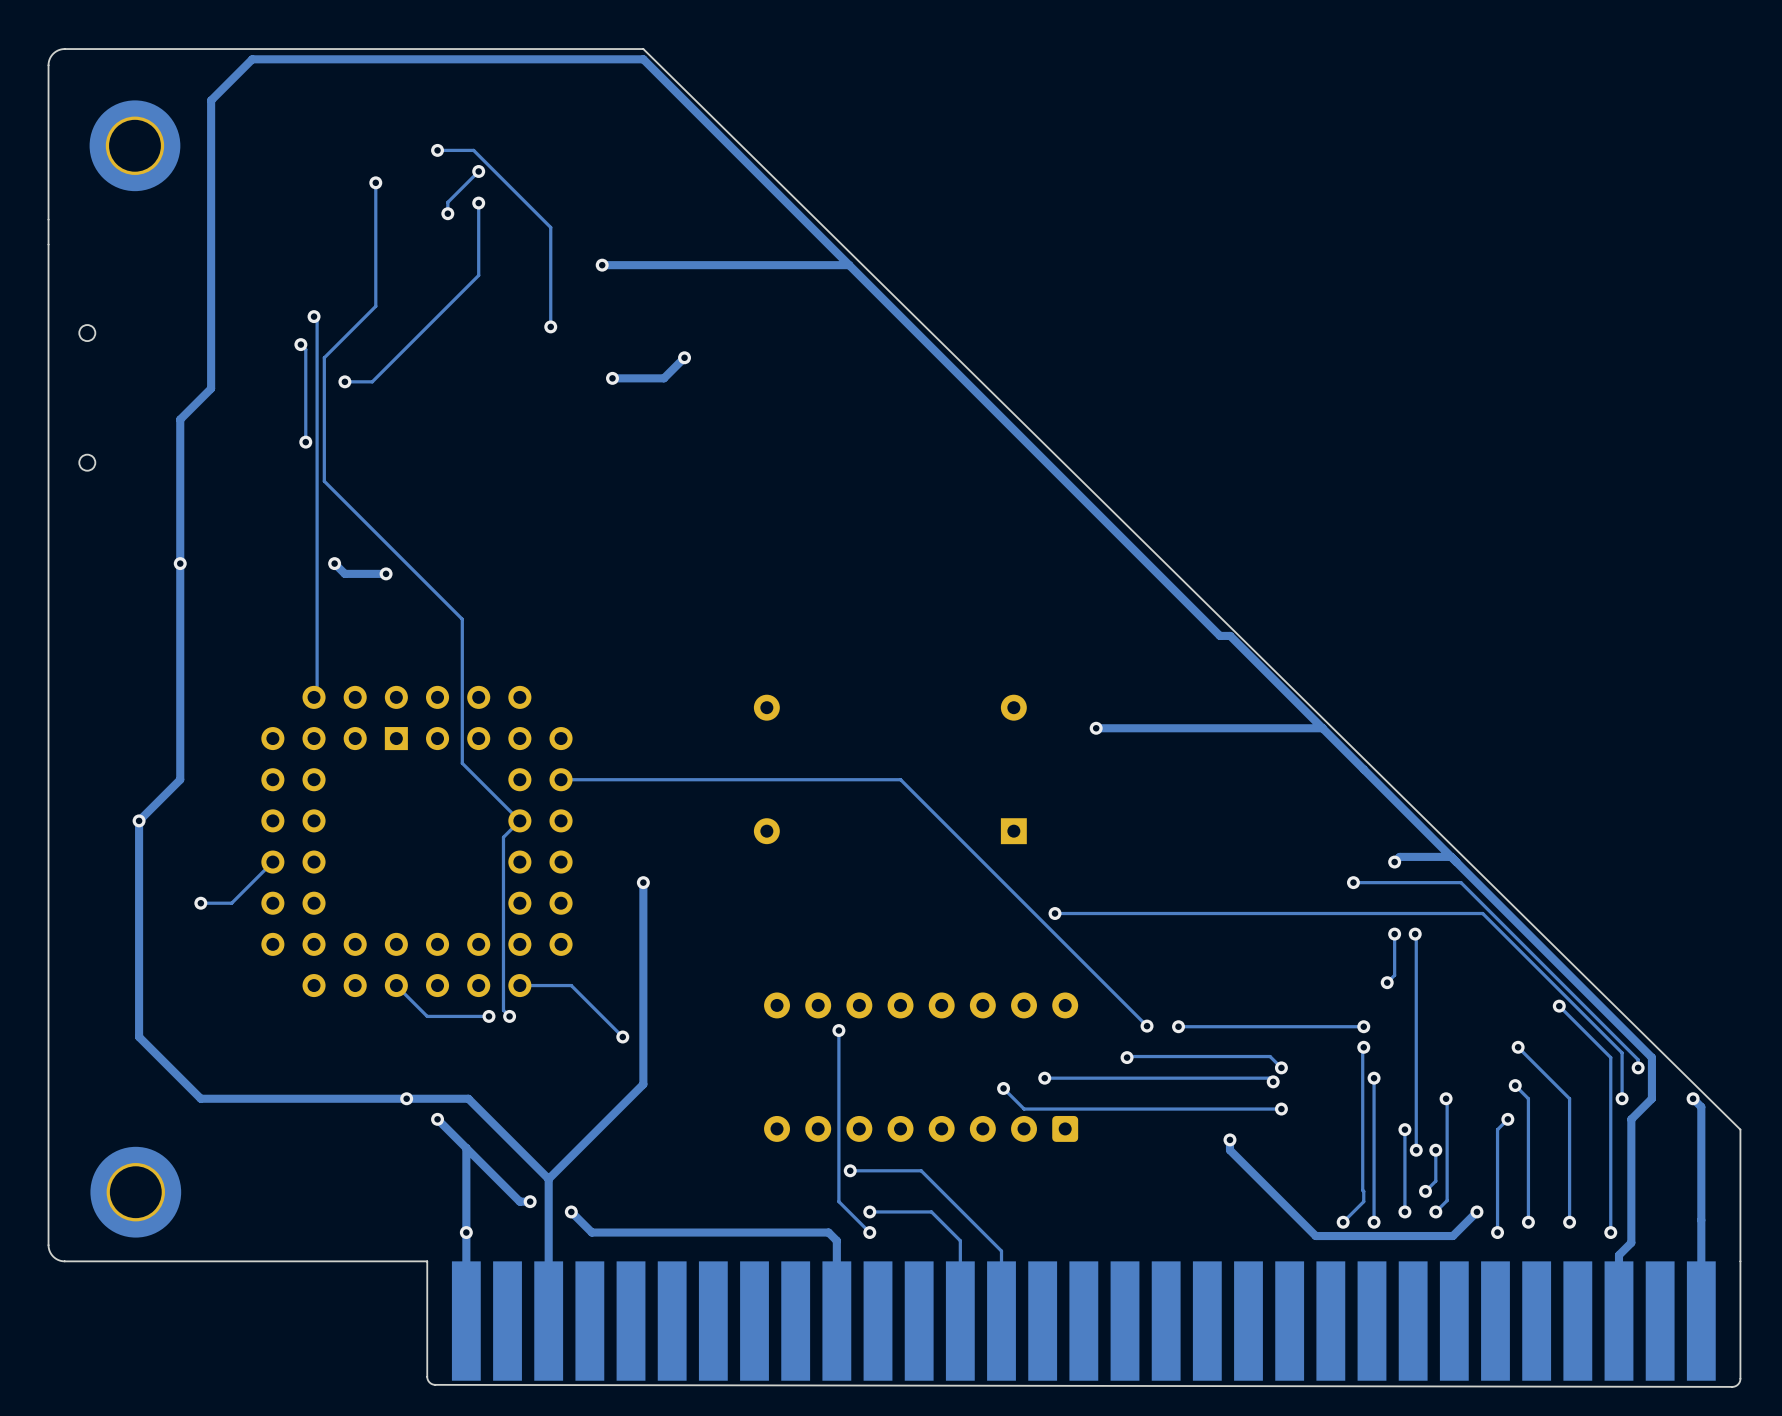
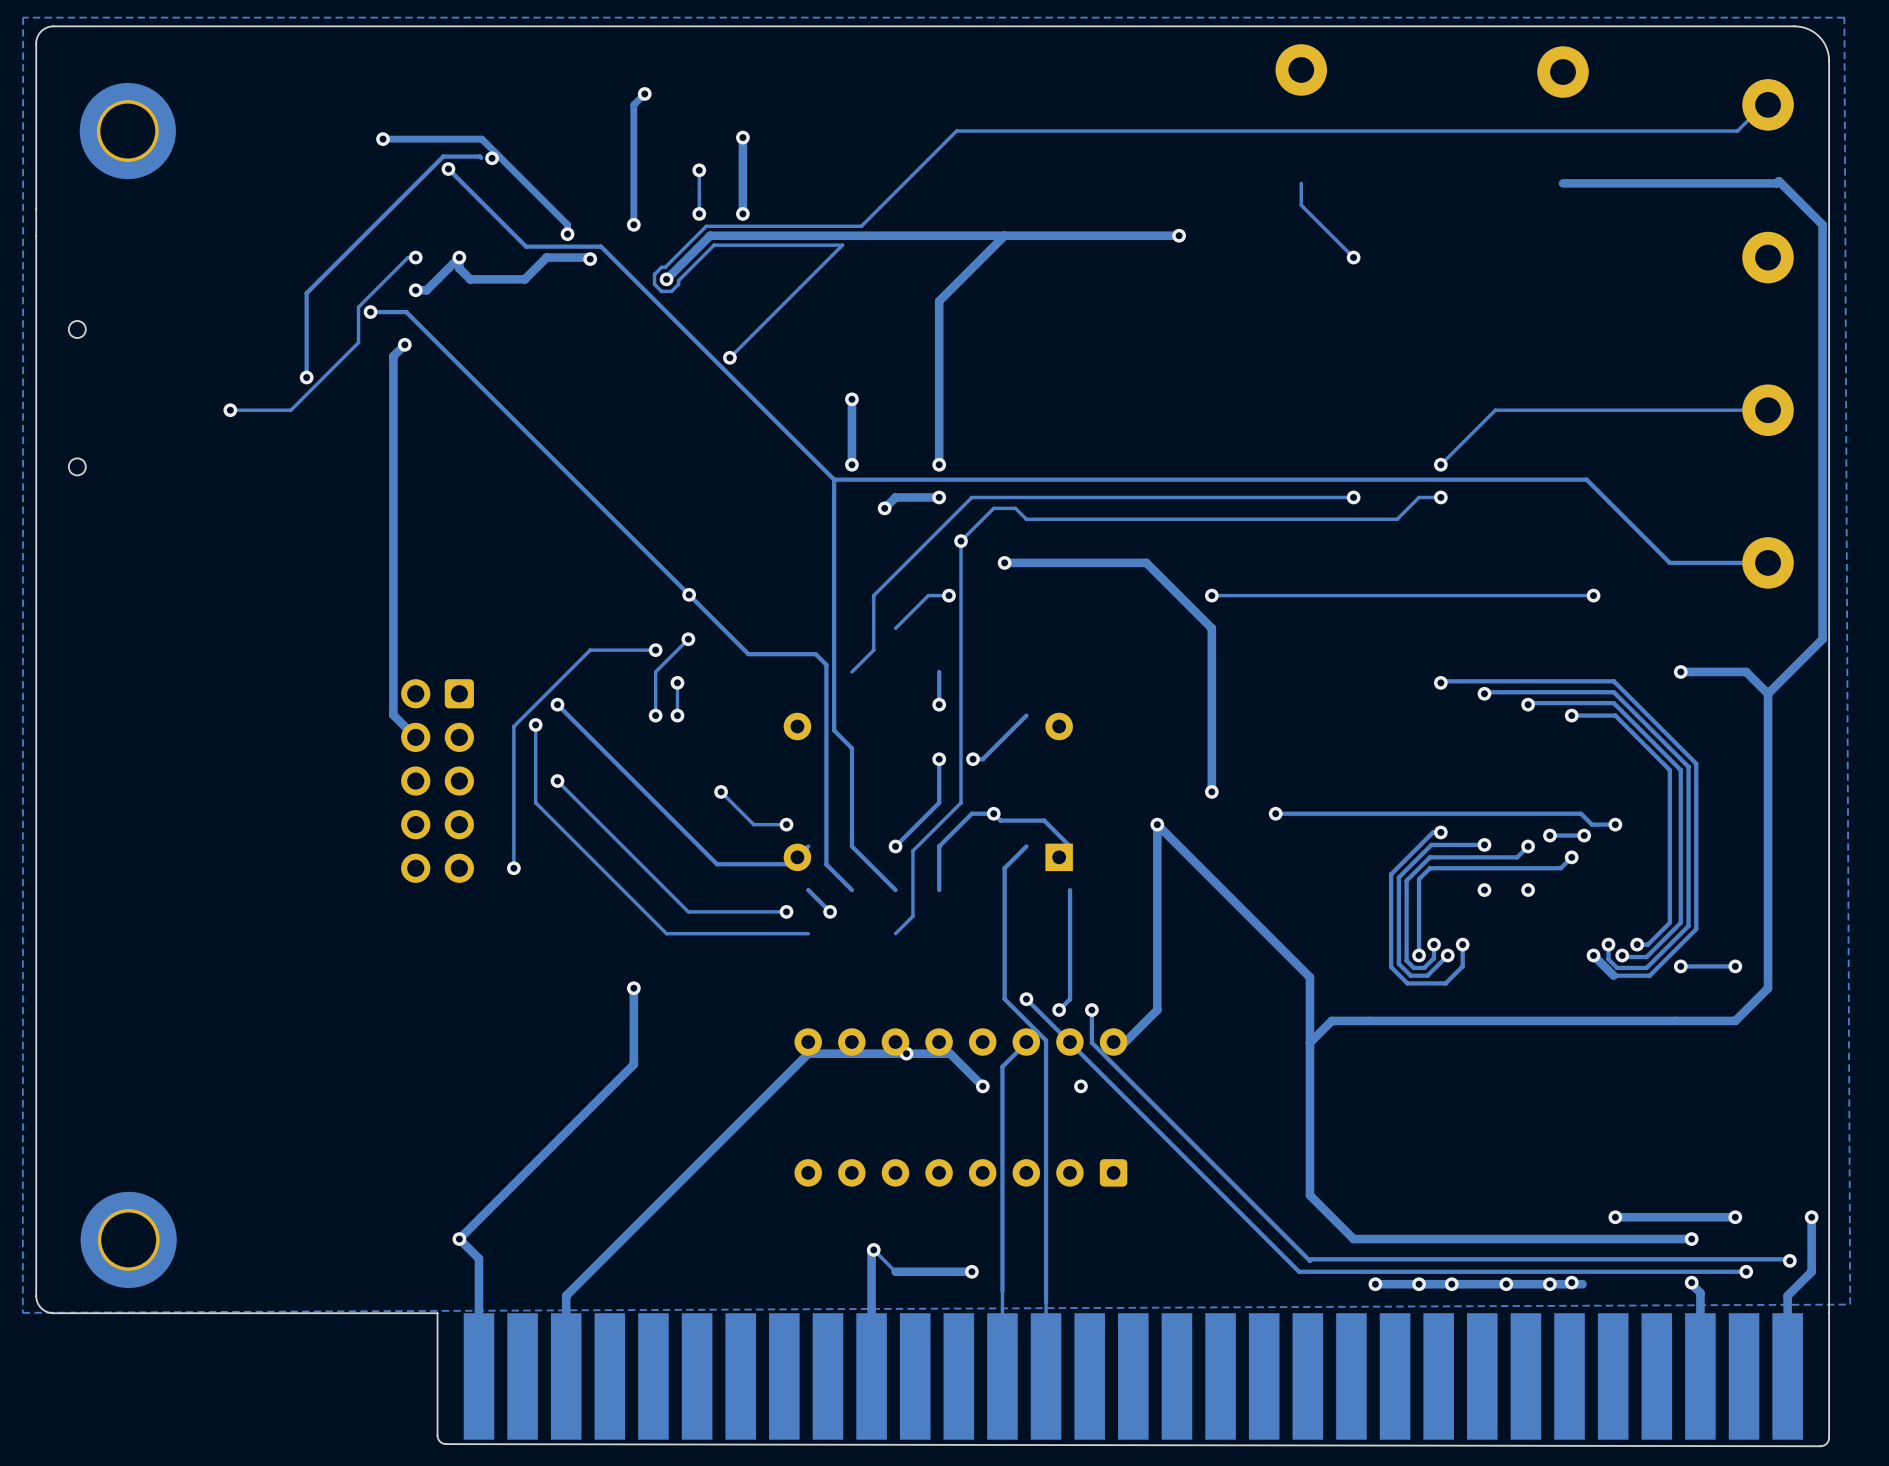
zone outline: none -> (1844, 17) (23, 17) (22, 1312) (1850, 1304) (1844, 17)
board edge: (48, 65) (53, 53) (64, 49) (643, 49) (1740, 1129) -> (36, 45) (39, 32) (45, 28) (53, 26) (1794, 26) (1813, 31) (1823, 42) (1829, 60) (1829, 1173)
part: none -> (1301, 69)
part: none -> (1563, 72)
track: none -> (644, 93) (633, 104) (633, 224)
via: none -> (644, 93)
track: none -> (1768, 104) (1763, 104) (1737, 131) (956, 131) (861, 226) (706, 226) (665, 267) (661, 267) (654, 274) (654, 284) (661, 291) (671, 291) (678, 284) (678, 280) (714, 245) (842, 245) (729, 357)
part: none -> (1768, 104)
track: (437, 150) (473, 150) (550, 227) (550, 326) -> none
via: (437, 150) -> none
track: none -> (742, 137) (742, 213)
via: none -> (742, 137)
track: none -> (383, 139) (481, 139) (567, 224) (567, 234)
track: none -> (481, 157) (443, 156) (306, 293) (306, 377)
track: (478, 171) (447, 202) (447, 213) -> none
track: none -> (448, 169) (526, 246) (601, 246) (834, 479)
via: none -> (448, 169)
track: (375, 182) (375, 306) (324, 357) (324, 481) (462, 619) (462, 763) (519, 820) (503, 837) (503, 1010) (509, 1016) -> none
via position: (375, 182) -> (383, 139)
track: none -> (699, 170) (699, 213)
via: none -> (699, 170)
track: none -> (1301, 183) (1301, 205) (1353, 257)
track: none -> (1563, 183) (1776, 183) (1778, 181) (1822, 224) (1822, 639) (1768, 693)
track: (478, 203) (478, 275) (372, 381) (344, 381) -> none
via: (478, 203) -> none
via: (447, 213) -> none
via: none -> (699, 213)
via: none -> (742, 213)
via: none -> (633, 224)
via: none -> (567, 234)
track: none -> (1004, 235) (939, 301) (939, 464)
track: none -> (1179, 235) (710, 235) (666, 279)
via: none -> (1179, 235)
track: none -> (415, 257) (408, 257) (358, 307) (358, 342) (290, 410) (230, 410)
via: none -> (415, 257)
via: none -> (459, 257)
via: (602, 265) -> none
track: (849, 265) (602, 265) -> none
via: none -> (1353, 257)
part: none -> (1768, 257)
track: none -> (590, 259) (546, 257) (524, 279) (470, 279) (459, 268) (459, 257) (426, 290) (415, 290)
via: none -> (590, 259)
via: none -> (666, 279)
via: none -> (415, 290)
track: (314, 316) (317, 319) (317, 694) (314, 697) -> none
via: (314, 316) -> none
track: none -> (370, 312) (406, 312) (748, 654) (815, 654) (826, 664) (826, 864) (851, 890)
via: none -> (370, 312)
via: (550, 326) -> none
track: (300, 344) (305, 349) (305, 442) -> none
via: (300, 344) -> none
track: none -> (404, 344) (393, 356) (393, 715) (415, 737)
via: none -> (404, 344)
track: (684, 357) (663, 378) (612, 378) -> none
via position: (684, 357) -> (729, 357)
via: none -> (306, 377)
via: (612, 378) -> none
via: (344, 381) -> none
track: none -> (851, 399) (851, 464)
via: none -> (851, 399)
via: none -> (230, 410)
track: none -> (1768, 410) (1495, 410) (1440, 464)
part: none -> (1768, 410)
via: (305, 442) -> none
via: none -> (851, 464)
via: none -> (939, 464)
via: none -> (1440, 464)
track: none -> (834, 479) (834, 730) (851, 748) (851, 846) (895, 890)
track: none -> (834, 479) (1586, 479) (1669, 562) (1768, 562)
track: none -> (939, 497) (895, 497) (884, 508)
via: none -> (939, 497)
track: none -> (1353, 497) (971, 497) (873, 595) (873, 650) (851, 671)
via: none -> (1353, 497)
track: none -> (1440, 497) (1419, 497) (1397, 519) (1026, 519) (1015, 508) (993, 508) (961, 541) (961, 802) (912, 850) (912, 916) (895, 933)
via: none -> (1440, 497)
via: none -> (884, 508)
via: none -> (961, 541)
track: none -> (1004, 562) (1146, 562) (1211, 628) (1211, 791)
via: none -> (1004, 562)
part: none -> (1768, 562)
via: (180, 563) -> none
track: (334, 563) (344, 573) (386, 573) -> none
via: (334, 563) -> none
via: (386, 573) -> none
via: none -> (689, 594)
track: none -> (948, 595) (928, 595) (895, 628)
via: none -> (948, 595)
via: none -> (1211, 595)
track: none -> (1593, 595) (1211, 595)
via: none -> (1593, 595)
track: none -> (688, 639) (655, 671) (655, 715)
via: none -> (688, 639)
track: none -> (655, 650) (590, 650) (513, 726) (513, 868)
via: none -> (655, 650)
track: none -> (939, 671) (939, 704)
track: none -> (1680, 671) (1746, 671) (1768, 693)
via: none -> (1680, 671)
track: none -> (677, 682) (677, 715)
via: none -> (677, 682)
track: none -> (1440, 682) (1442, 681) (1613, 681) (1696, 763) (1696, 929) (1649, 975) (1613, 975)
via: none -> (1440, 682)
track: none -> (1484, 693) (1486, 692) (1613, 692) (1688, 766) (1688, 926) (1646, 967) (1617, 967) (1608, 959) (1608, 944)
via: none -> (1484, 693)
track: none -> (1768, 693) (1768, 988) (1735, 1020) (1331, 1020) (1309, 1042)
track: none -> (557, 704) (717, 864) (790, 864) (808, 846)
via: none -> (557, 704)
via: none -> (939, 704)
track: none -> (1528, 704) (1529, 703) (1613, 703) (1680, 770) (1680, 922) (1646, 957) (1622, 955)
via: none -> (1528, 704)
via: none -> (655, 715)
via: none -> (677, 715)
track: none -> (1026, 715) (982, 759) (973, 759)
track: none -> (1571, 715) (1615, 715) (1669, 770) (1669, 922) (1648, 944) (1637, 944)
via: none -> (1571, 715)
track: none -> (535, 724) (535, 802) (666, 933) (808, 933)
via: none -> (535, 724)
via: (1096, 728) -> none
track: (1322, 728) (1096, 728) -> none
track: none -> (939, 759) (939, 802) (895, 846)
via: none -> (939, 759)
via: none -> (973, 759)
part: none -> (437, 781)
track: none -> (557, 781) (688, 911) (786, 911)
via: none -> (557, 781)
track: none -> (721, 791) (753, 824) (786, 824)
via: none -> (721, 791)
via: none -> (1211, 791)
track: (561, 779) (900, 779) (1147, 1026) -> none
via: none -> (993, 813)
track: none -> (1275, 813) (1581, 813) (1591, 824) (1615, 824)
via: none -> (1275, 813)
via: none -> (786, 824)
via: none -> (1157, 824)
via: none -> (1615, 824)
track: none -> (1440, 832) (1432, 832) (1391, 874) (1391, 967) (1407, 983) (1445, 983) (1462, 966) (1462, 944)
via: none -> (1440, 832)
via: none -> (1549, 835)
track: none -> (1584, 835) (1549, 835)
via: none -> (1584, 835)
track: none -> (1484, 844) (1431, 844) (1398, 877) (1398, 963) (1410, 975) (1427, 975) (1447, 955)
via: none -> (1484, 844)
via: (139, 820) -> none
via: none -> (895, 846)
track: none -> (1070, 846) (1044, 820) (1000, 820) (993, 813) (971, 813) (939, 846) (939, 890)
track: none -> (1528, 846) (1517, 857) (1429, 857) (1406, 880) (1406, 960) (1413, 967) (1424, 967) (1433, 958) (1433, 944)
via: none -> (1528, 846)
track: none -> (1571, 857) (1560, 868) (1429, 868) (1419, 879) (1419, 955)
via: none -> (1571, 857)
part: (416, 841) -> none
via: none -> (513, 868)
track: (1451, 856) (1399, 856) (1394, 862) -> none
track: (272, 862) (231, 903) (200, 903) -> none
track: none -> (808, 890) (830, 911)
track: none -> (1070, 890) (1070, 999) (1059, 1010)
via position: (1394, 862) -> (1484, 890)
via: none -> (1528, 890)
track: (643, 882) (643, 1084) (548, 1179) -> none
via: (643, 882) -> none
via: none -> (786, 911)
via: none -> (830, 911)
track: (1353, 882) (1461, 882) (1638, 1059) (1638, 1067) -> none
via: (1353, 882) -> none
via: (200, 903) -> none
track: (1055, 913) (1482, 913) (1622, 1052) (1622, 1098) -> none
via: (1055, 913) -> none
via: none -> (1433, 944)
via: none -> (1462, 944)
via: none -> (1608, 944)
via: none -> (1637, 944)
via: none -> (1419, 955)
via: none -> (1447, 955)
track: (1518, 923) (1230, 635) (1219, 635) (643, 59) (252, 59) (211, 100) (211, 388) (180, 419) (180, 779) (139, 820) (139, 1037) (200, 1098) (468, 1098) (548, 1179) -> none
via: none -> (1593, 955)
via: none -> (1622, 955)
track: (1394, 934) (1394, 975) (1387, 982) -> none
via: (1394, 934) -> none
track: (1415, 934) (1416, 1150) -> none
via: (1415, 934) -> none
via: none -> (1680, 966)
track: none -> (1735, 966) (1680, 966)
via: none -> (1735, 966)
track: (1537, 942) (1651, 1057) (1651, 1098) (1631, 1119) (1631, 1242) (1618, 1255) -> (1691, 1284) (1700, 1292) (1700, 1306)
via: none -> (633, 988)
track: none -> (1026, 999) (1299, 1271) (1746, 1271)
via: none -> (1026, 999)
via: none -> (1059, 1010)
track: none -> (1091, 1010) (1091, 1042) (1309, 1260) (1311, 1259) (1788, 1259) (1789, 1260)
via: none -> (1091, 1010)
via: (1387, 982) -> none
track: (396, 985) (427, 1016) (488, 1016) -> none
track: (519, 985) (571, 985) (622, 1037) -> none
track: none -> (1124, 1042) (1157, 1010) (1157, 824) (1309, 977) (1309, 1195) (1353, 1239) (1691, 1239)
track: (1559, 1006) (1610, 1057) (1610, 1232) -> none
via: (1559, 1006) -> none
via: (488, 1016) -> none
via: (509, 1016) -> none
via: (1147, 1026) -> none
via: (1178, 1026) -> none
track: (1363, 1026) (1178, 1026) -> none
via: (1363, 1026) -> none
track: (838, 1030) (838, 1201) -> (871, 1291) (871, 1252) (873, 1249)
via position: (838, 1030) -> (906, 1053)
via: (622, 1037) -> none
via: none -> (982, 1086)
via: none -> (1080, 1086)
track: (1363, 1047) (1363, 1201) (1343, 1222) -> none
via: (1363, 1047) -> none
track: (1518, 1047) (1569, 1098) (1569, 1222) -> none
via: (1518, 1047) -> none
track: (1127, 1057) (1270, 1056) (1281, 1067) -> none
via: (1127, 1057) -> none
via: (1281, 1067) -> none
via: (1638, 1067) -> none
track: (1044, 1078) (1269, 1078) (1273, 1081) -> none
via: (1044, 1078) -> none
track: (1374, 1078) (1374, 1222) -> none
via: (1374, 1078) -> none
via: (1273, 1081) -> none
track: (1515, 1085) (1528, 1098) (1528, 1222) -> none
via: (1515, 1085) -> none
track: (1003, 1088) (1024, 1109) (1281, 1109) -> none
via: (1003, 1088) -> none
via: (406, 1098) -> none
track: (1446, 1098) (1447, 1200) (1435, 1211) -> none
via: (1446, 1098) -> none
via: (1622, 1098) -> none
track: (1693, 1098) (1701, 1106) (1701, 1244) -> (1811, 1217) (1811, 1271) (1787, 1295)
via: (1693, 1098) -> none
via: (1281, 1109) -> none
track: (437, 1119) (519, 1201) (530, 1201) -> none
via: (437, 1119) -> none
track: (1507, 1119) (1497, 1129) (1497, 1232) -> none
via: (1507, 1119) -> none
track: (1404, 1129) (1404, 1211) -> none
via: (1404, 1129) -> none
track: (1229, 1139) (1229, 1150) (1315, 1236) (1452, 1236) (1476, 1211) -> none
via: (1229, 1139) -> none
track: (466, 1148) (466, 1209) -> (633, 988) (633, 1064) (459, 1239) (478, 1258)
via: (1416, 1150) -> none
track: (1435, 1150) (1435, 1181) (1425, 1191) -> none
via: (1435, 1150) -> none
track: (850, 1170) (921, 1170) (1001, 1251) -> (1026, 846) (1004, 868) (1004, 999) (1046, 1040) (1046, 1302)
via: (850, 1170) -> none
via: none -> (1615, 1217)
track: none -> (1735, 1217) (1615, 1217)
via: none -> (1735, 1217)
via: none -> (1811, 1217)
track: (548, 1179) (548, 1244) -> (982, 1086) (950, 1053) (808, 1053) (566, 1295)
via: none -> (459, 1239)
via: (1425, 1191) -> none
via: none -> (1691, 1239)
via: (530, 1201) -> none
via: none -> (873, 1249)
track: (571, 1211) (591, 1232) (828, 1232) (836, 1240) -> none
via: (571, 1211) -> none
track: (869, 1211) (931, 1211) (960, 1240) -> (1026, 1042) (1002, 1066) (1002, 1291)
via: (869, 1211) -> none
via: (1404, 1211) -> none
via: (1435, 1211) -> none
via position: (1476, 1211) -> (1549, 1284)
via: none -> (1789, 1260)
track: (859, 1222) (869, 1232) -> (895, 1271) (971, 1271)
via: none -> (971, 1271)
via position: (1343, 1222) -> (1419, 1284)
via position: (1374, 1222) -> (1451, 1284)
via: (1528, 1222) -> none
via: (1569, 1222) -> none
via: none -> (1746, 1271)
via: (466, 1232) -> none
via: (869, 1232) -> none
via: none -> (1375, 1284)
via: none -> (1506, 1284)
track: none -> (1582, 1284) (1375, 1284)

